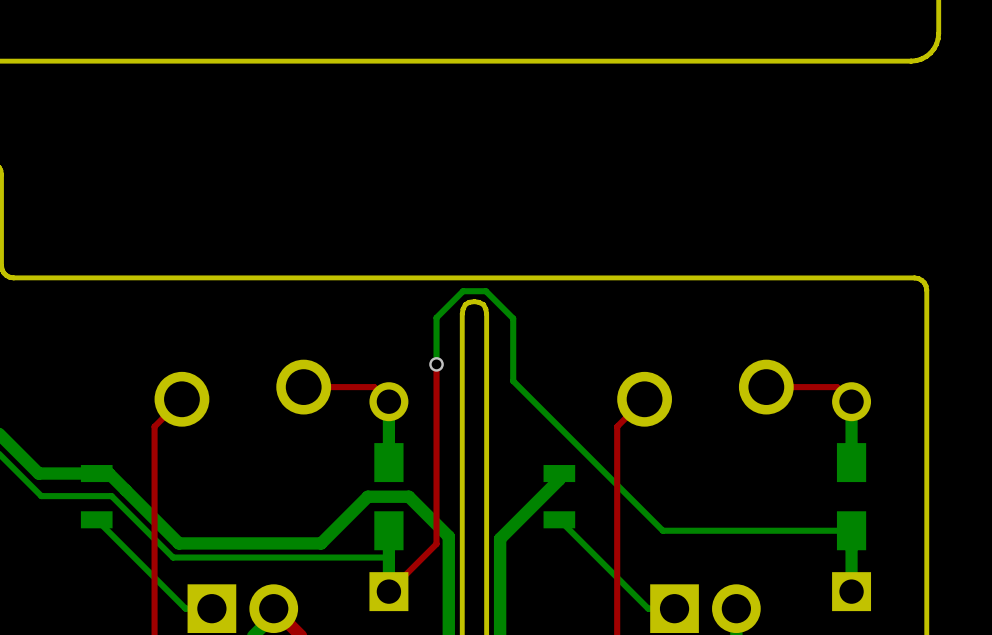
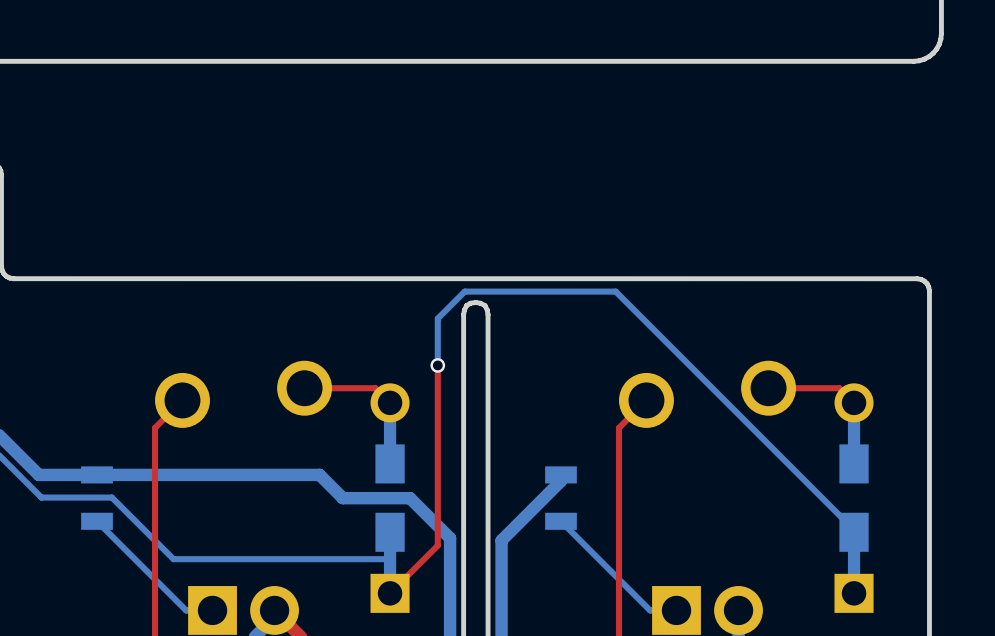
bottom track: (436, 317) (463, 291) (485, 291) (513, 318) (513, 381) (662, 530) (851, 530) -> (437, 318) (464, 291) (615, 291) (854, 529)
bottom track: (109, 473) (178, 543) (321, 543) (367, 496) -> (109, 474) (319, 474) (342, 498) (368, 498)

